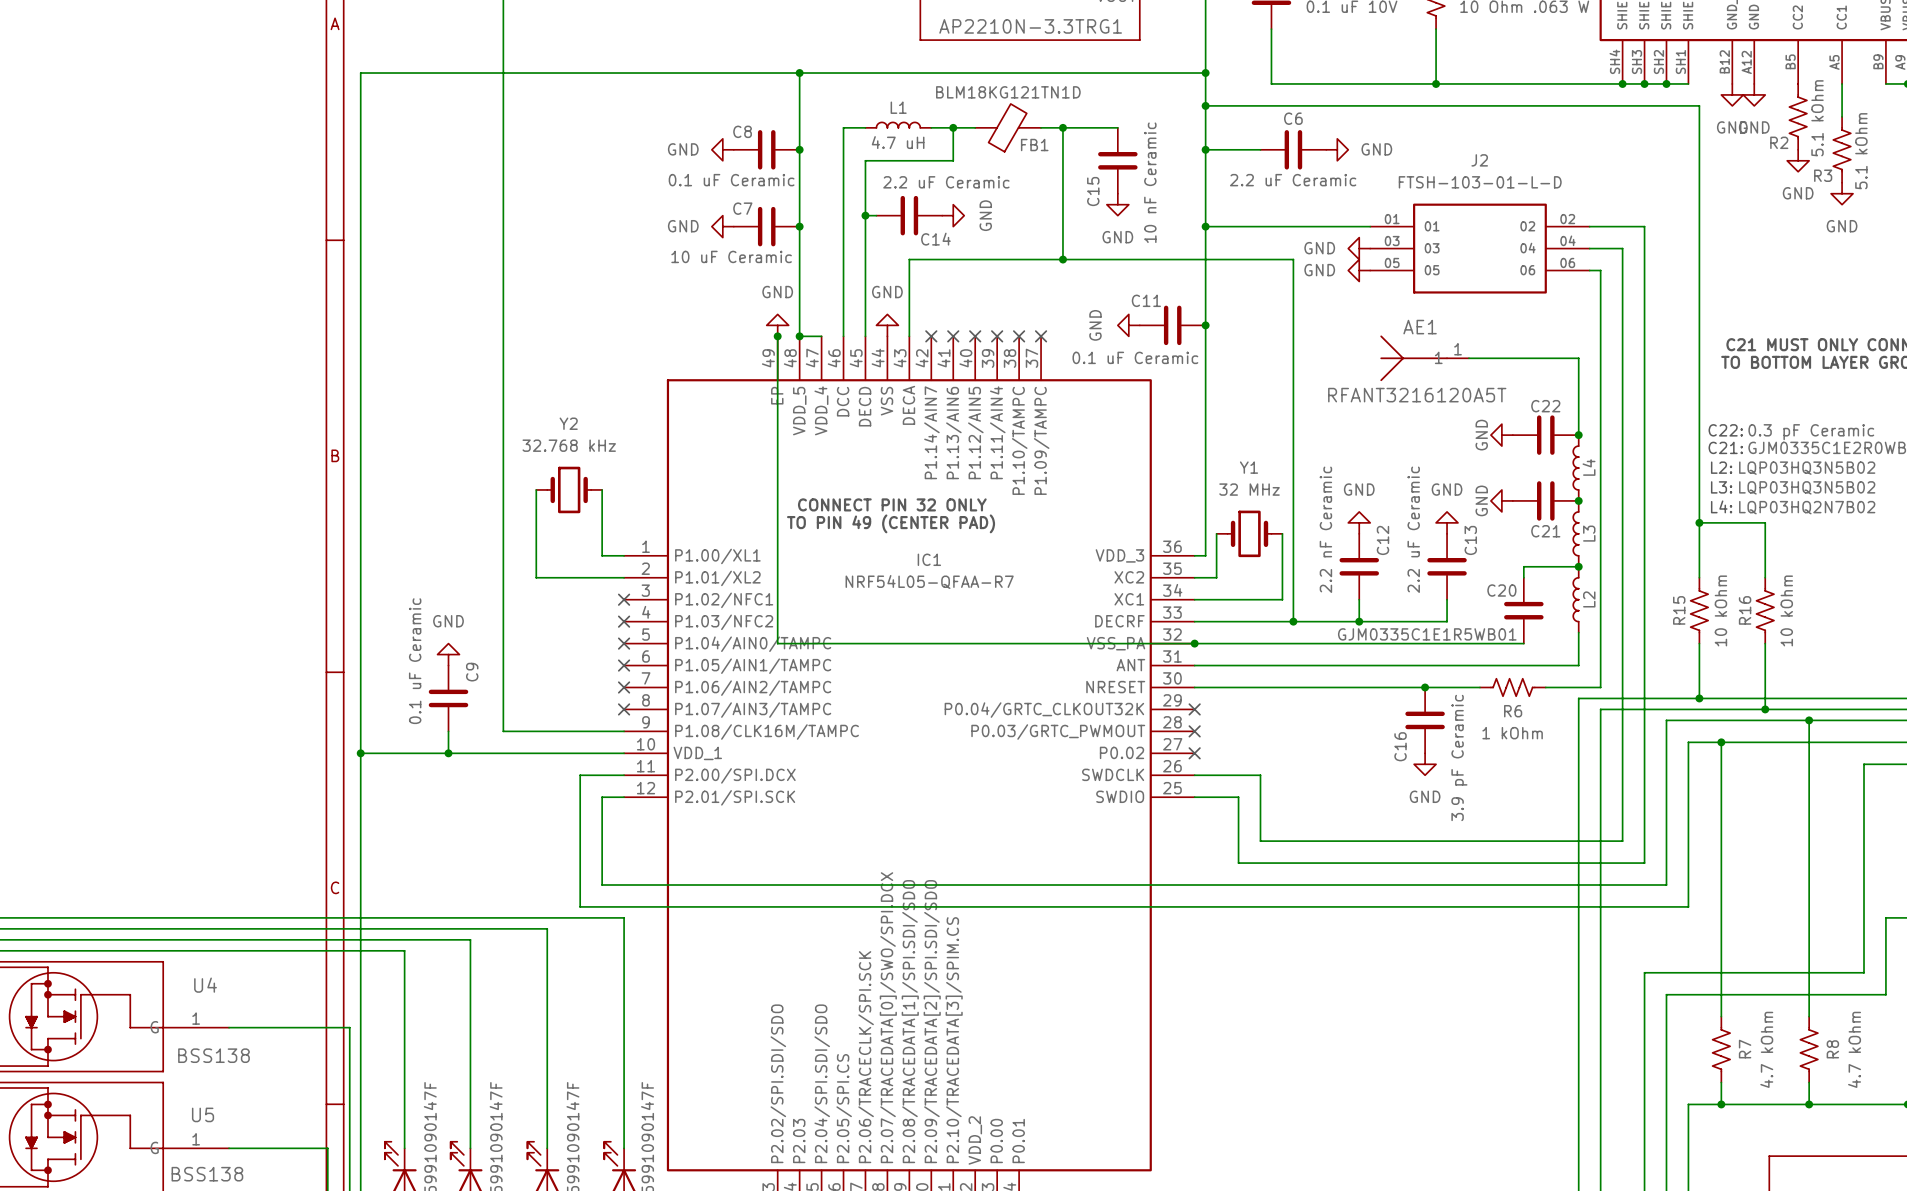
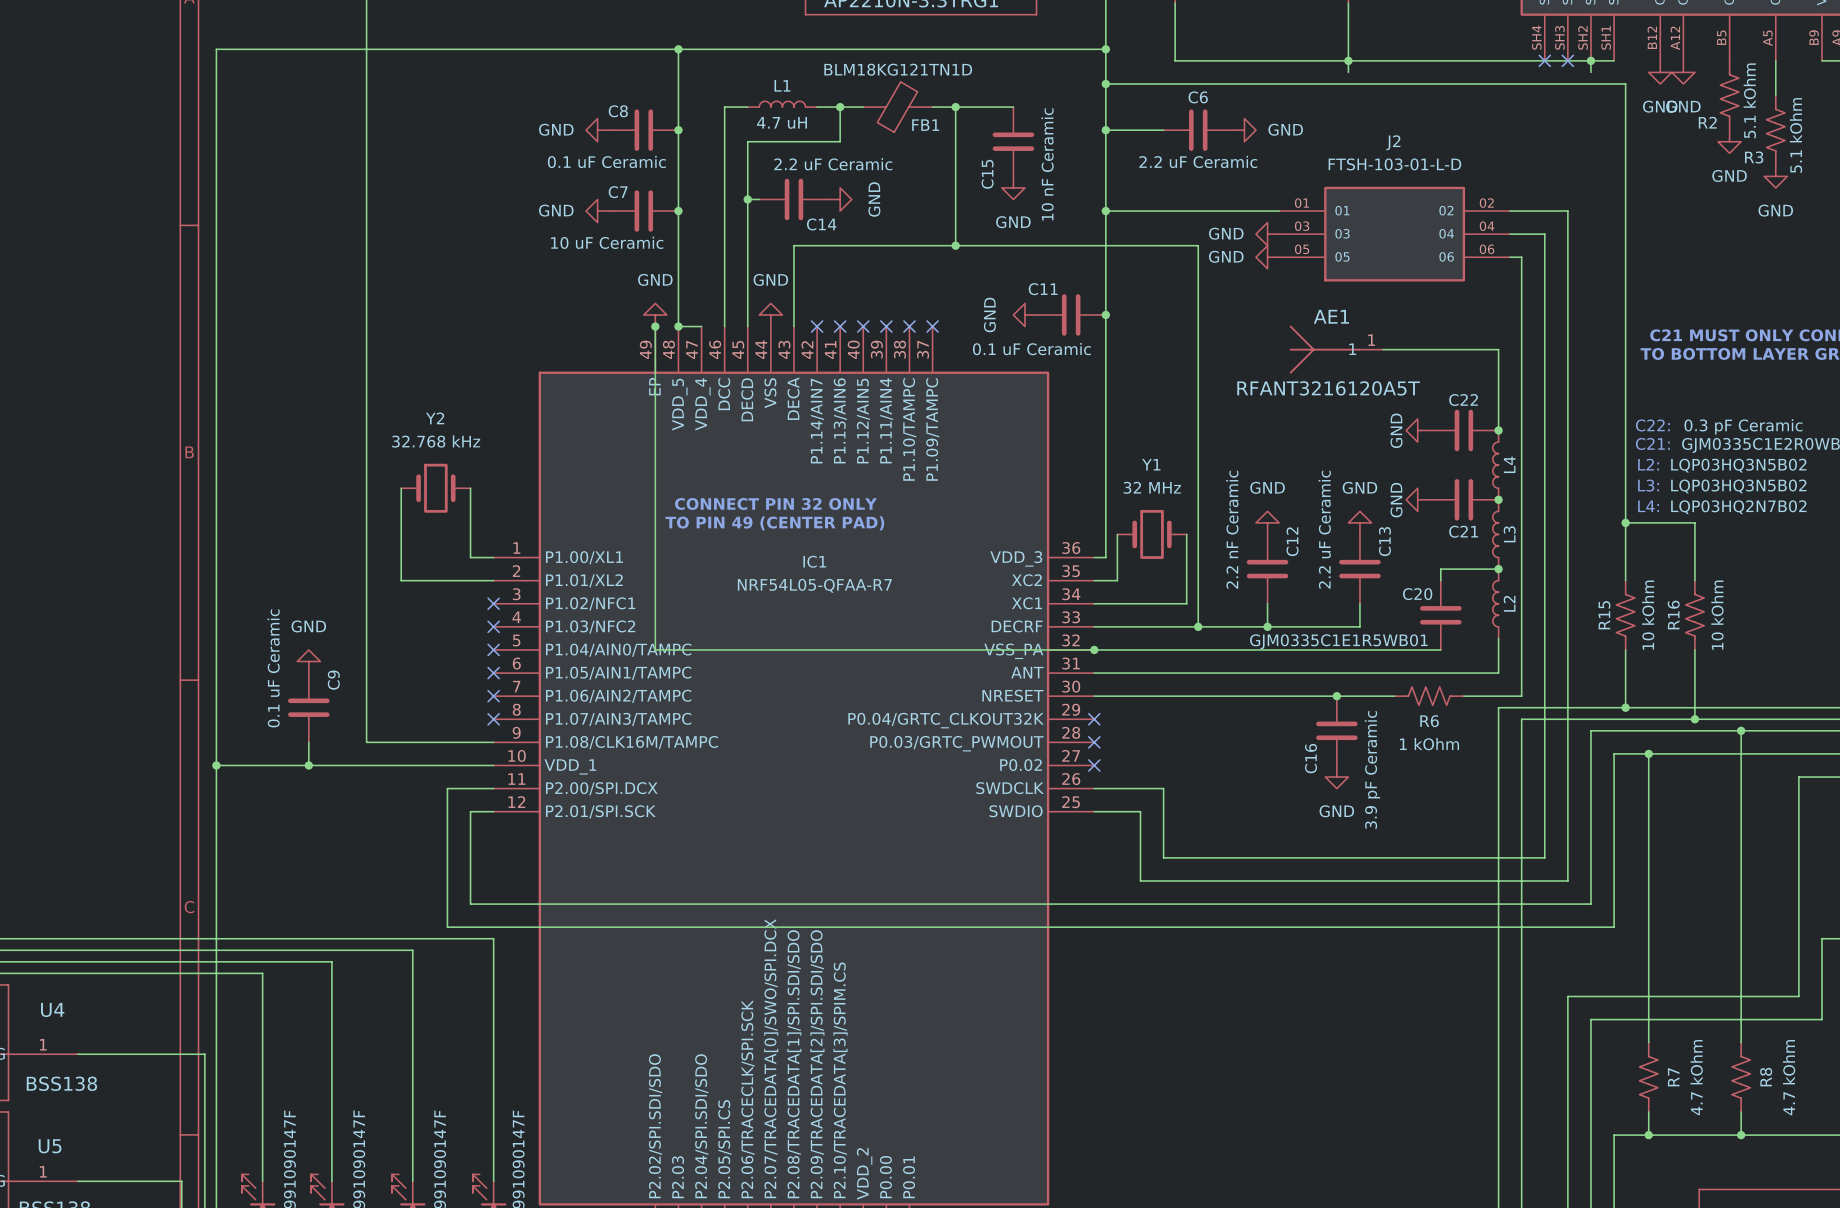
wire: none -> (1348, 60) (1348, 72)
junction: (1622, 83) -> none
no-connect mark: none -> (1544, 60)
junction: (1644, 83) -> none
no-connect mark: none -> (1567, 60)
wire: none -> (1590, 60) (1590, 72)

